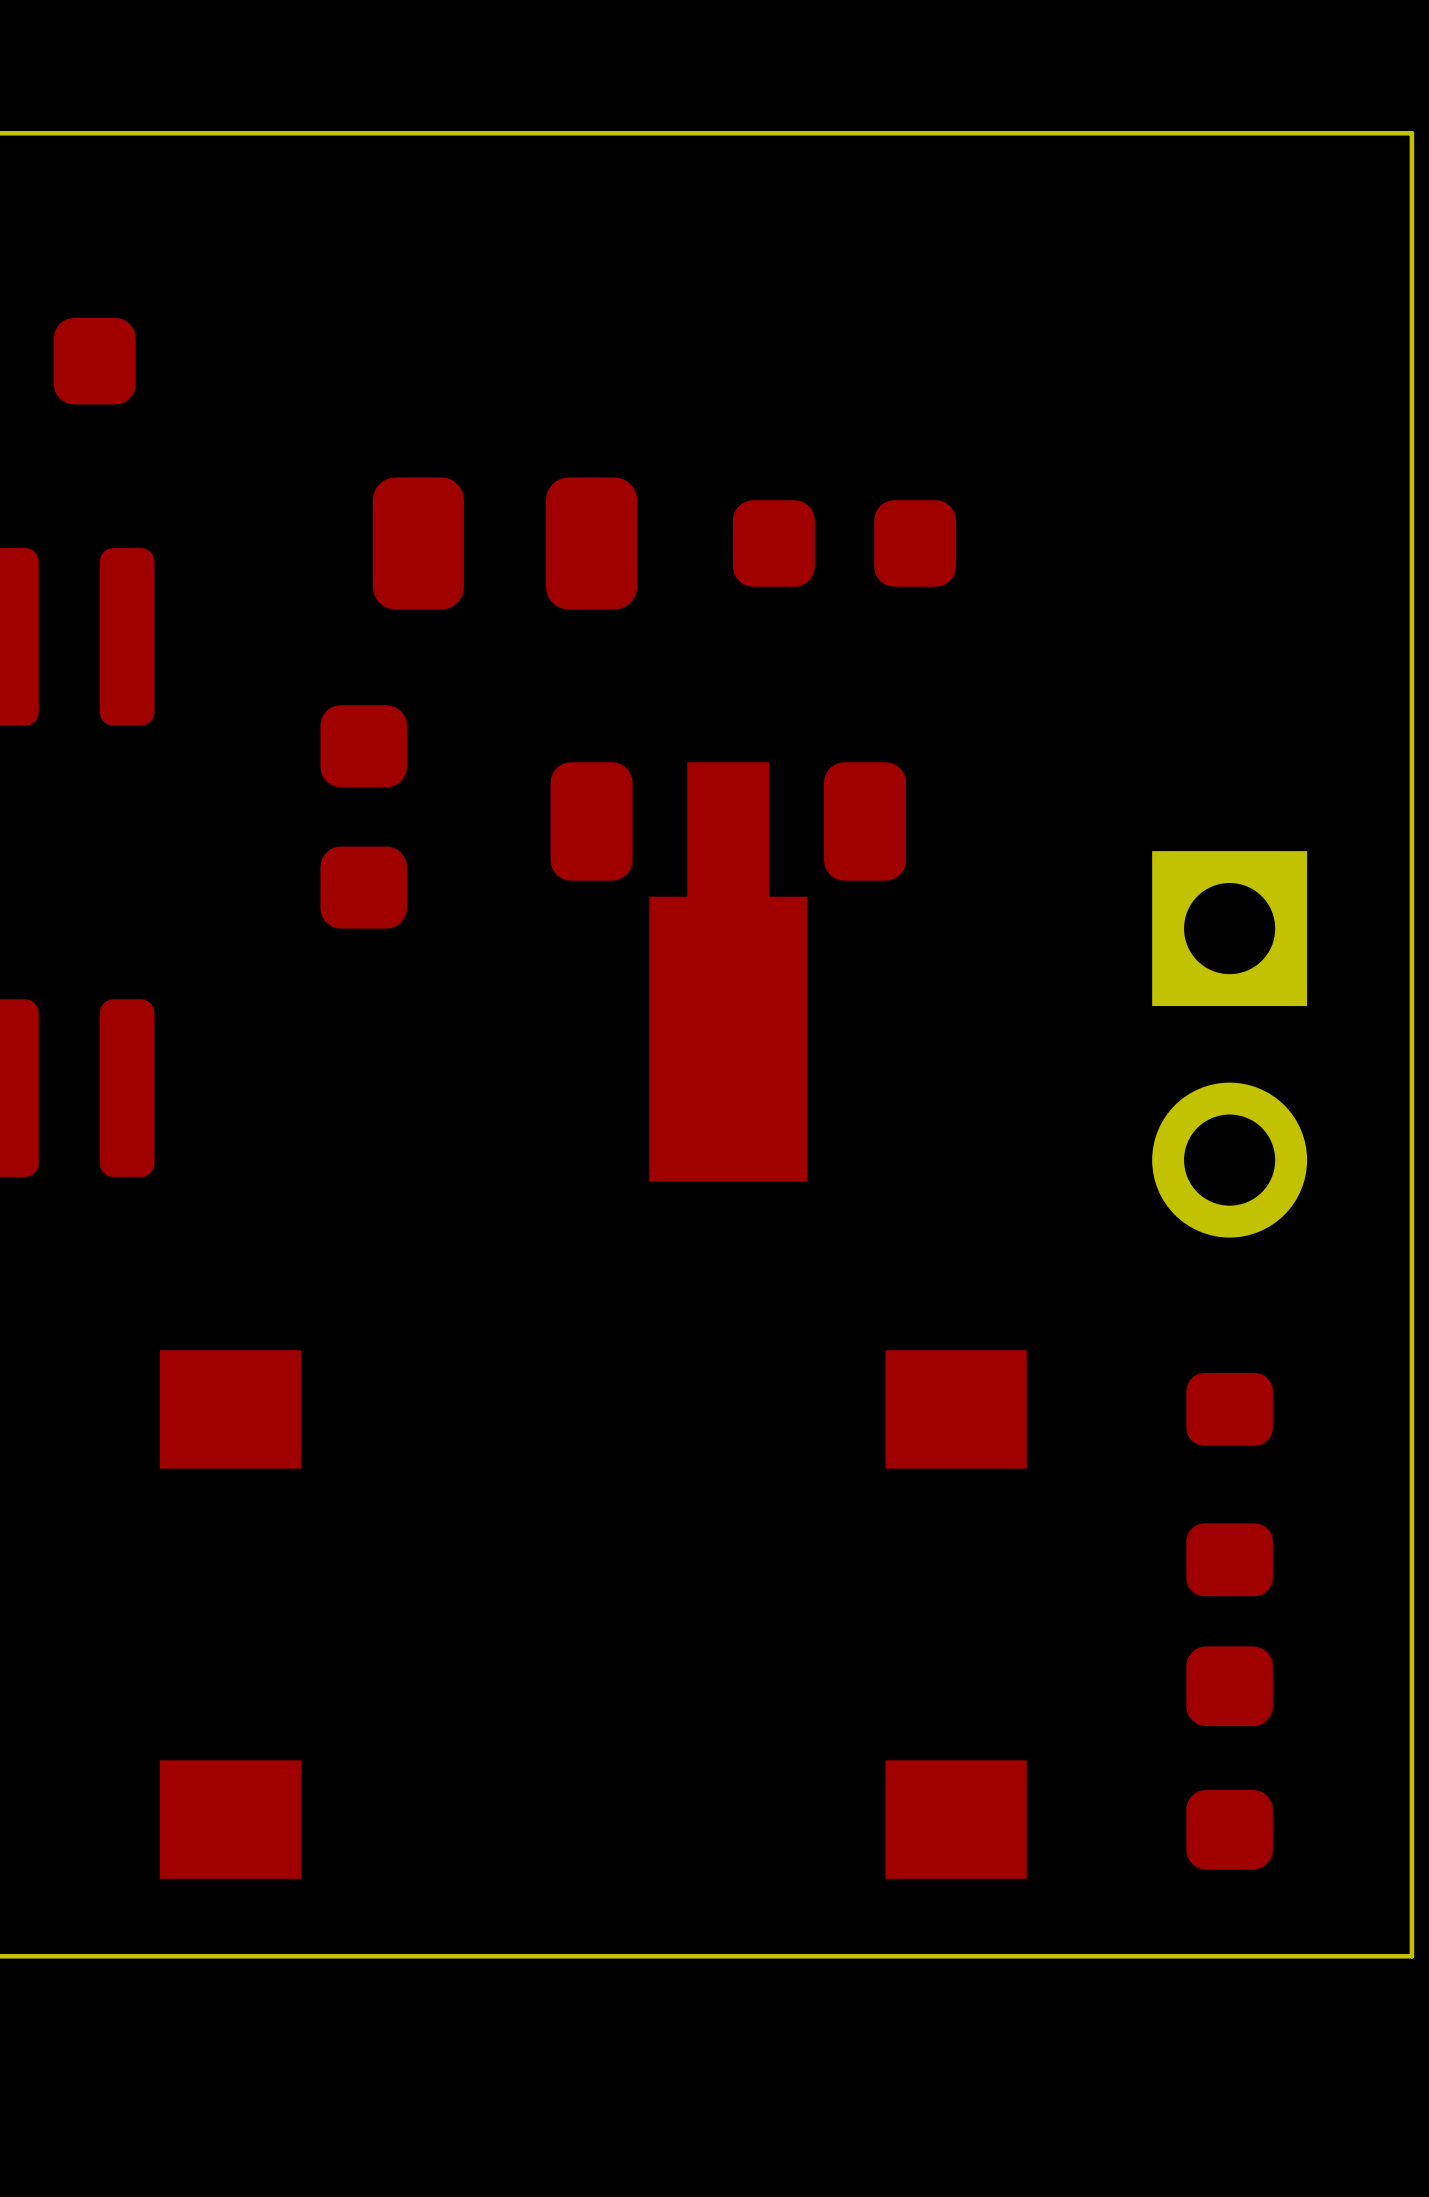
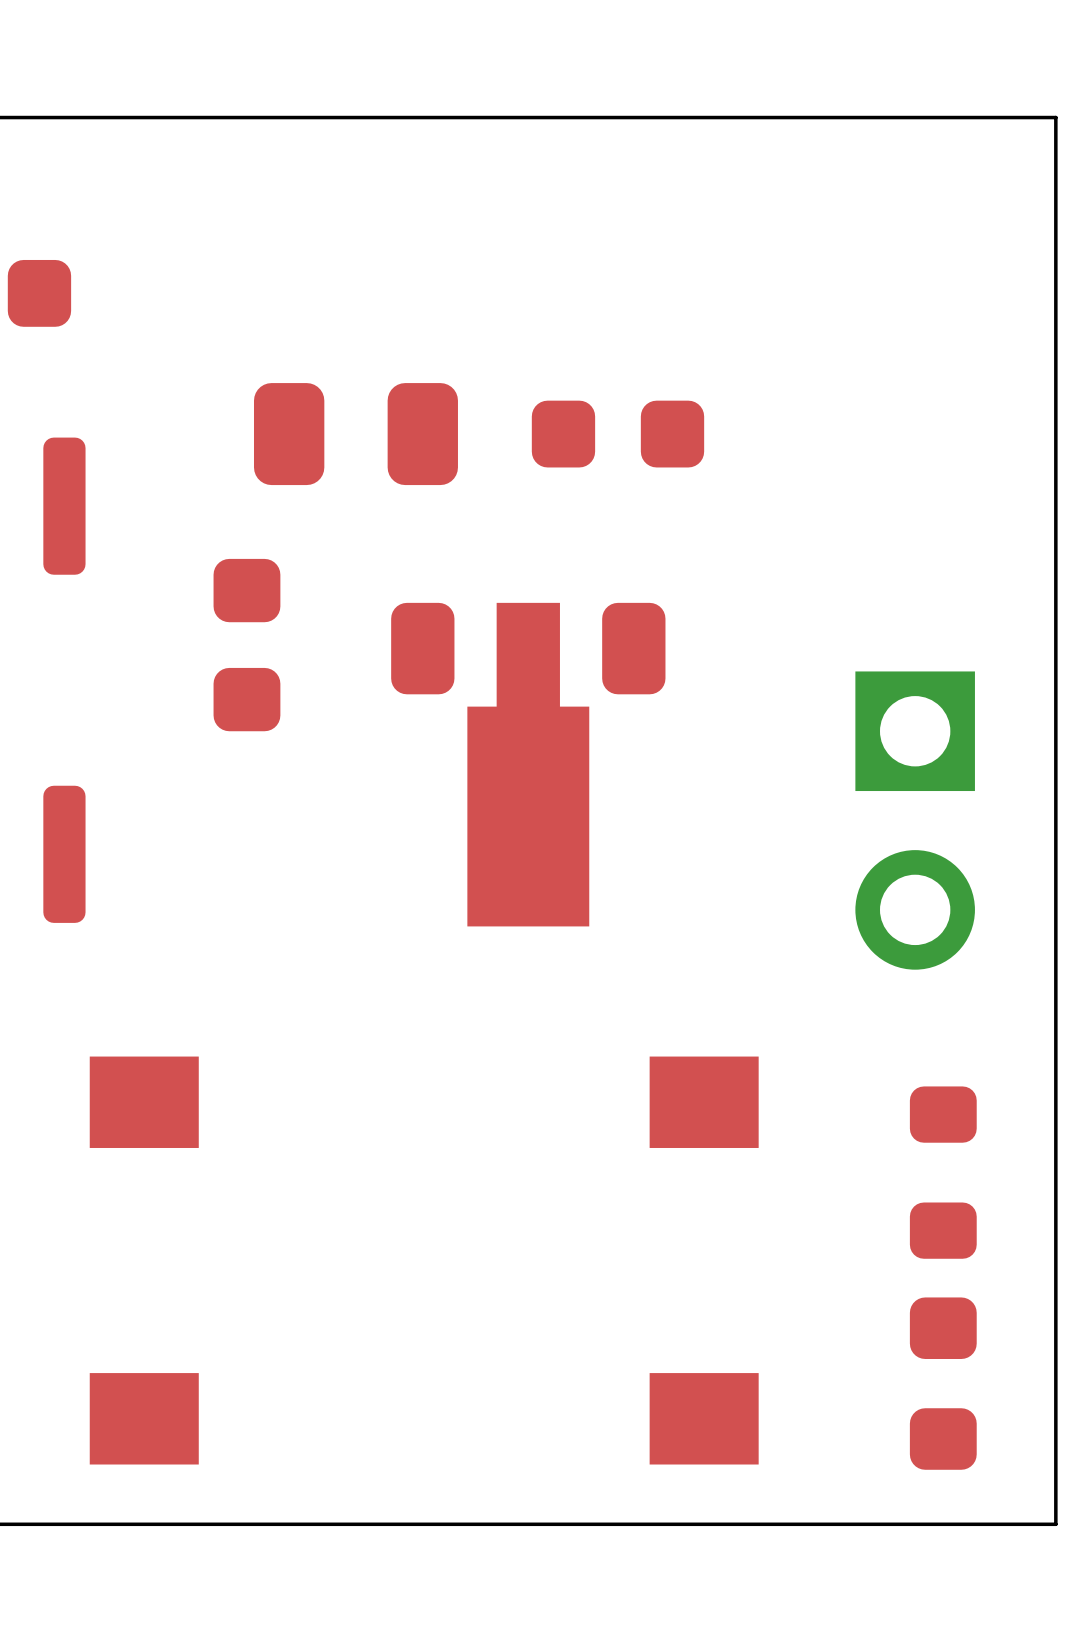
part position: (1229, 1484) -> (943, 1172)
part position: (1229, 1758) -> (943, 1383)

